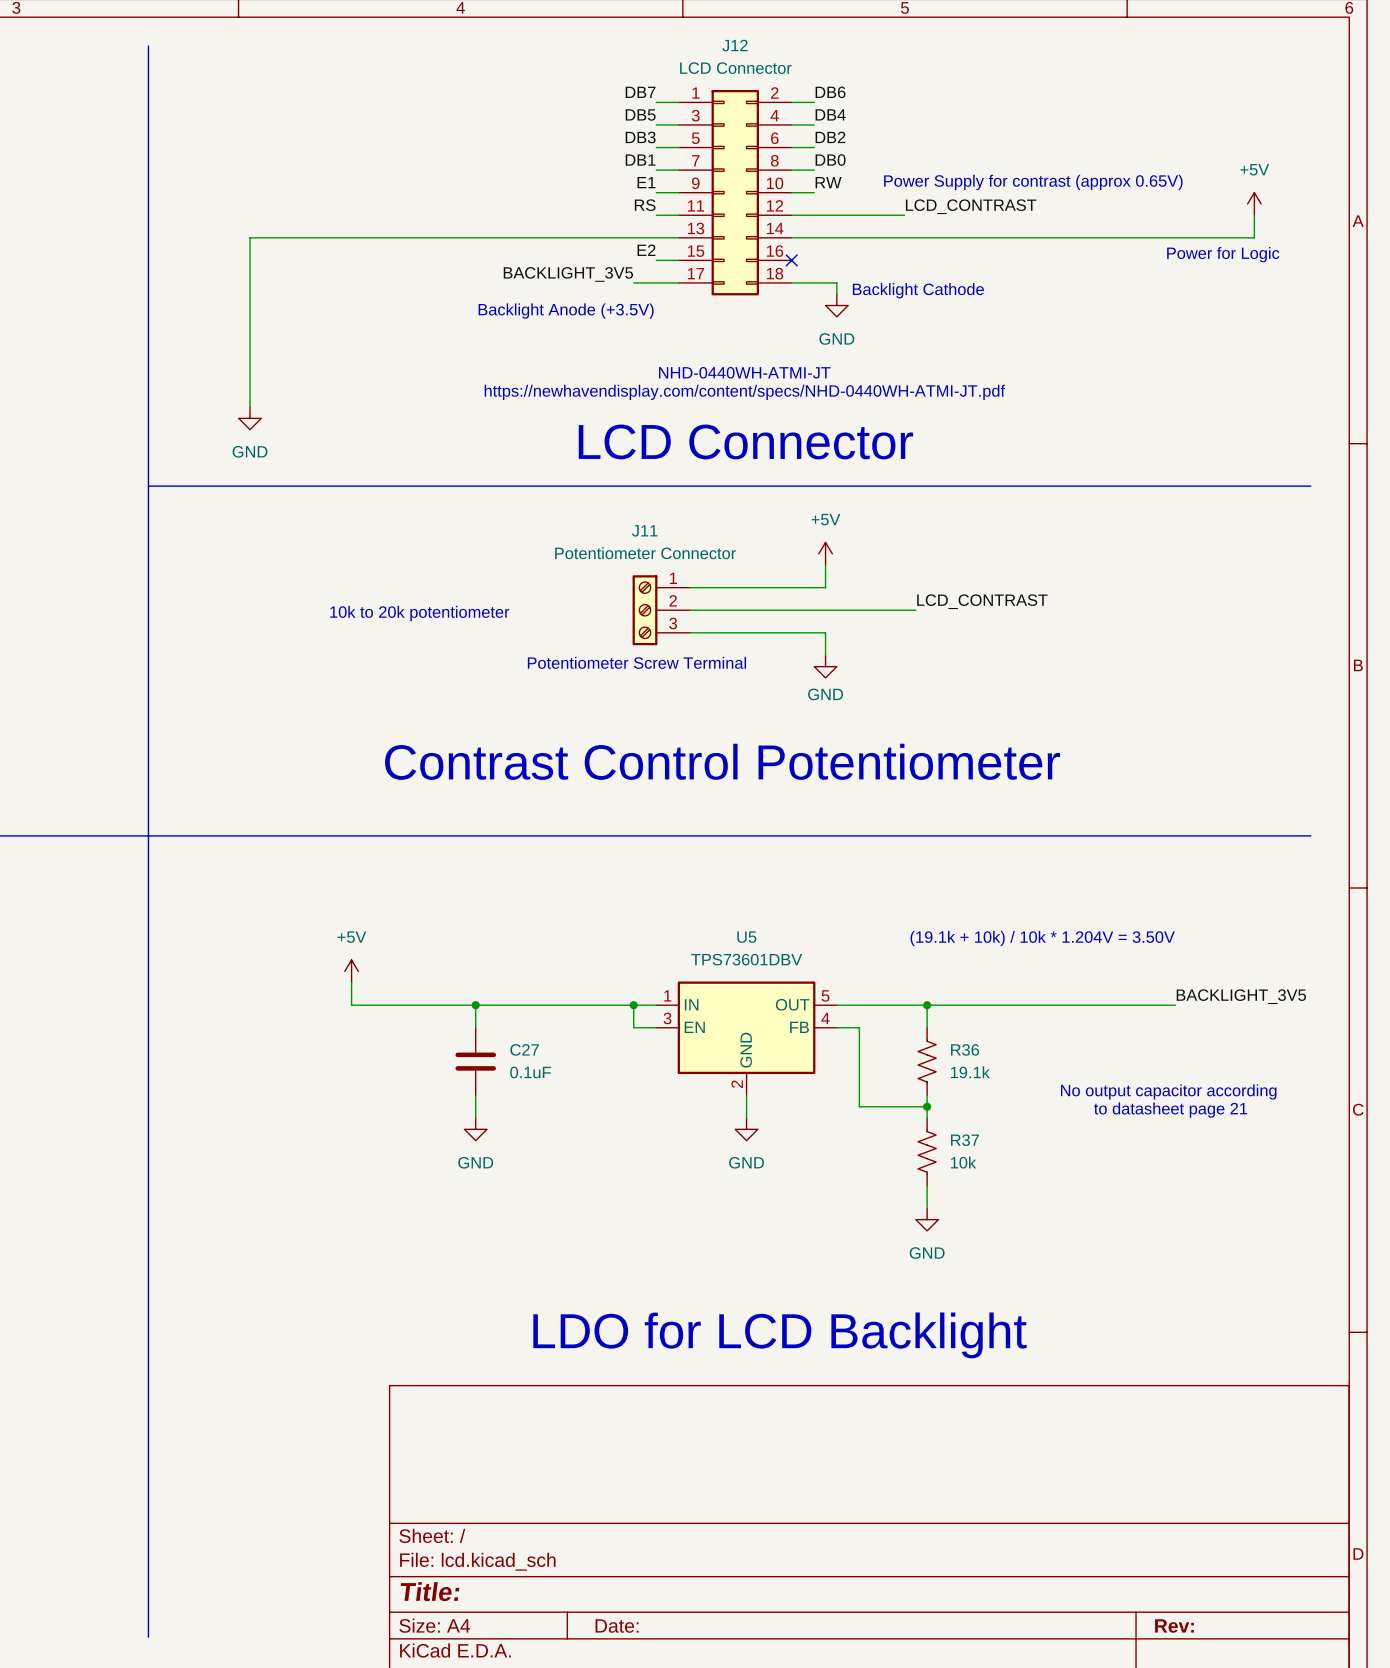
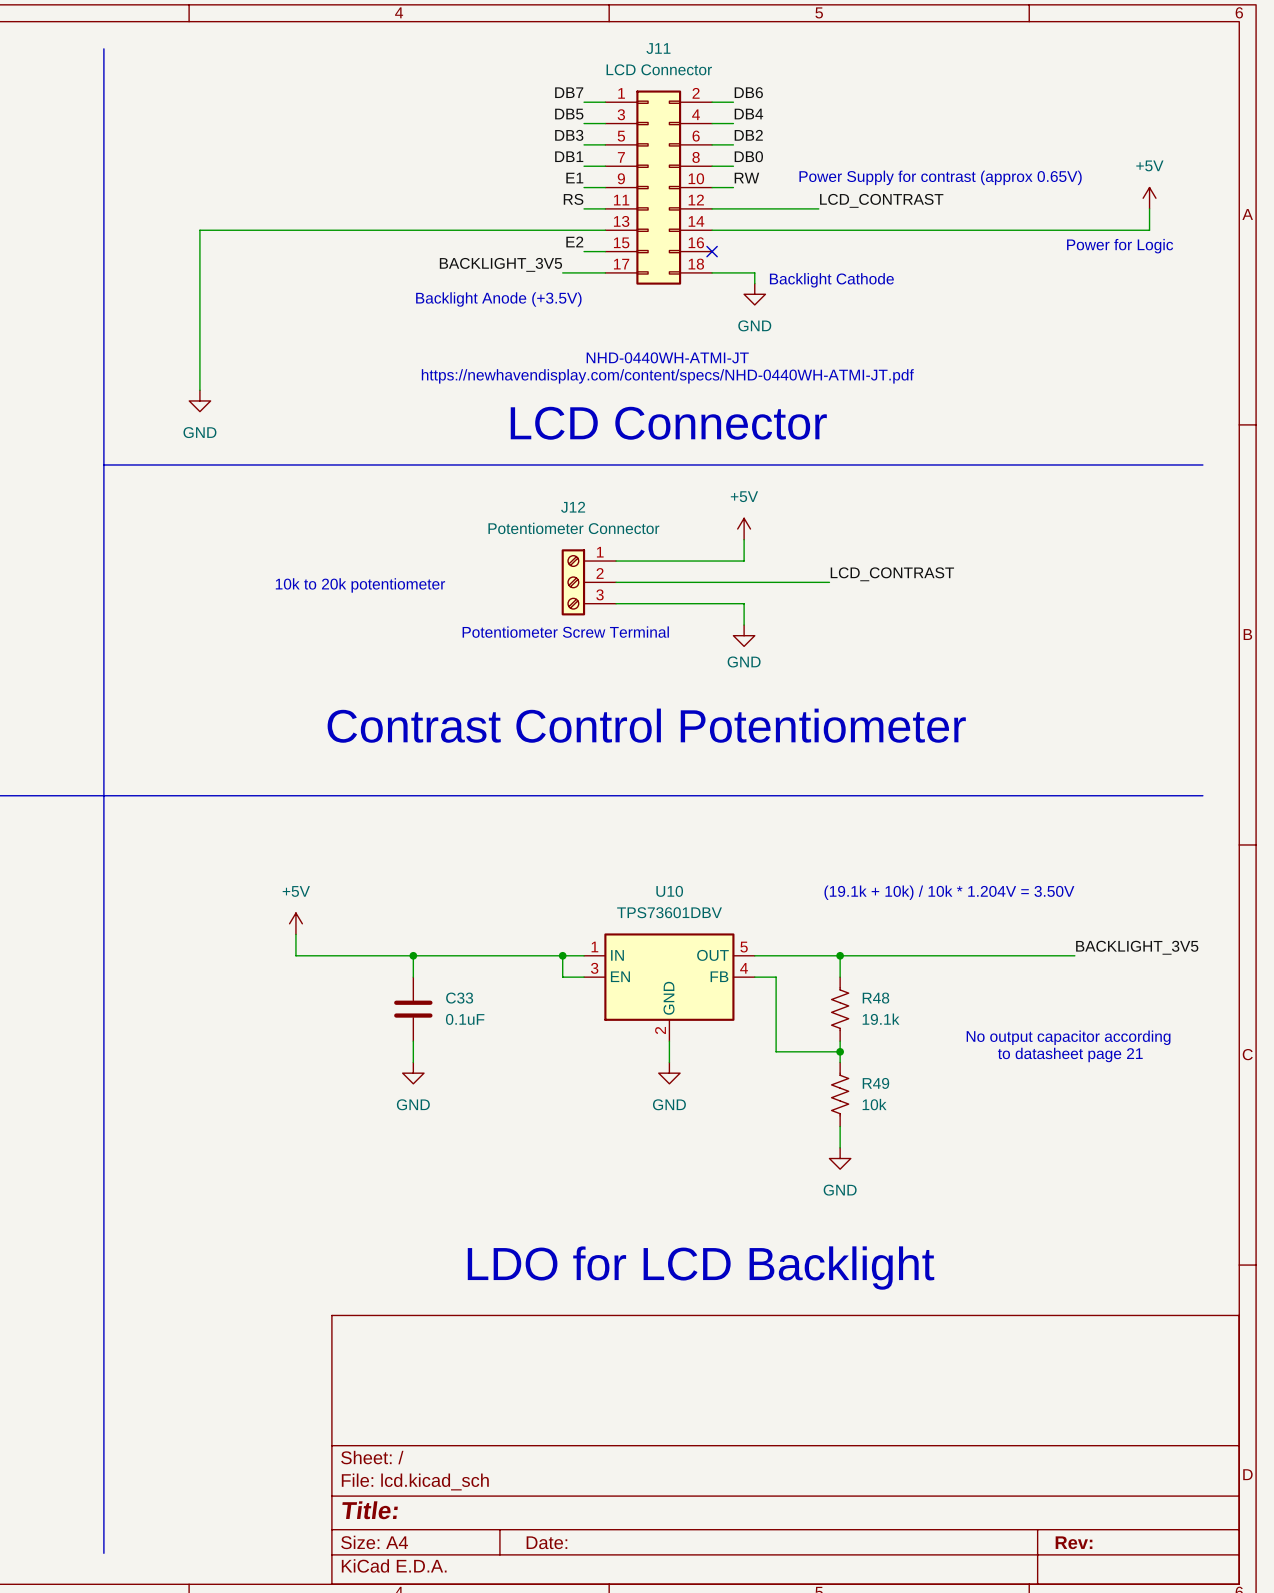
J12 name: J12 (734, 45) -> J11 (658, 48)
J11 name: J11 (644, 530) -> J12 (573, 507)
U5 name: U5 (746, 937) -> U10 (669, 891)
C27 name: C27 (524, 1049) -> C33 (459, 998)
R36 name: R36 (965, 1049) -> R48 (875, 998)
R37 name: R37 (964, 1140) -> R49 (875, 1083)

